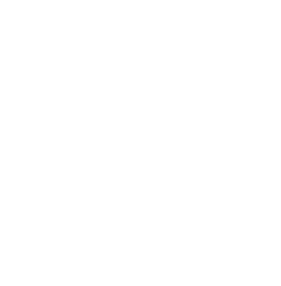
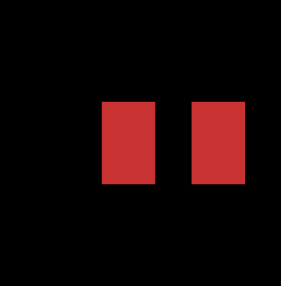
part: none -> (173, 143)

